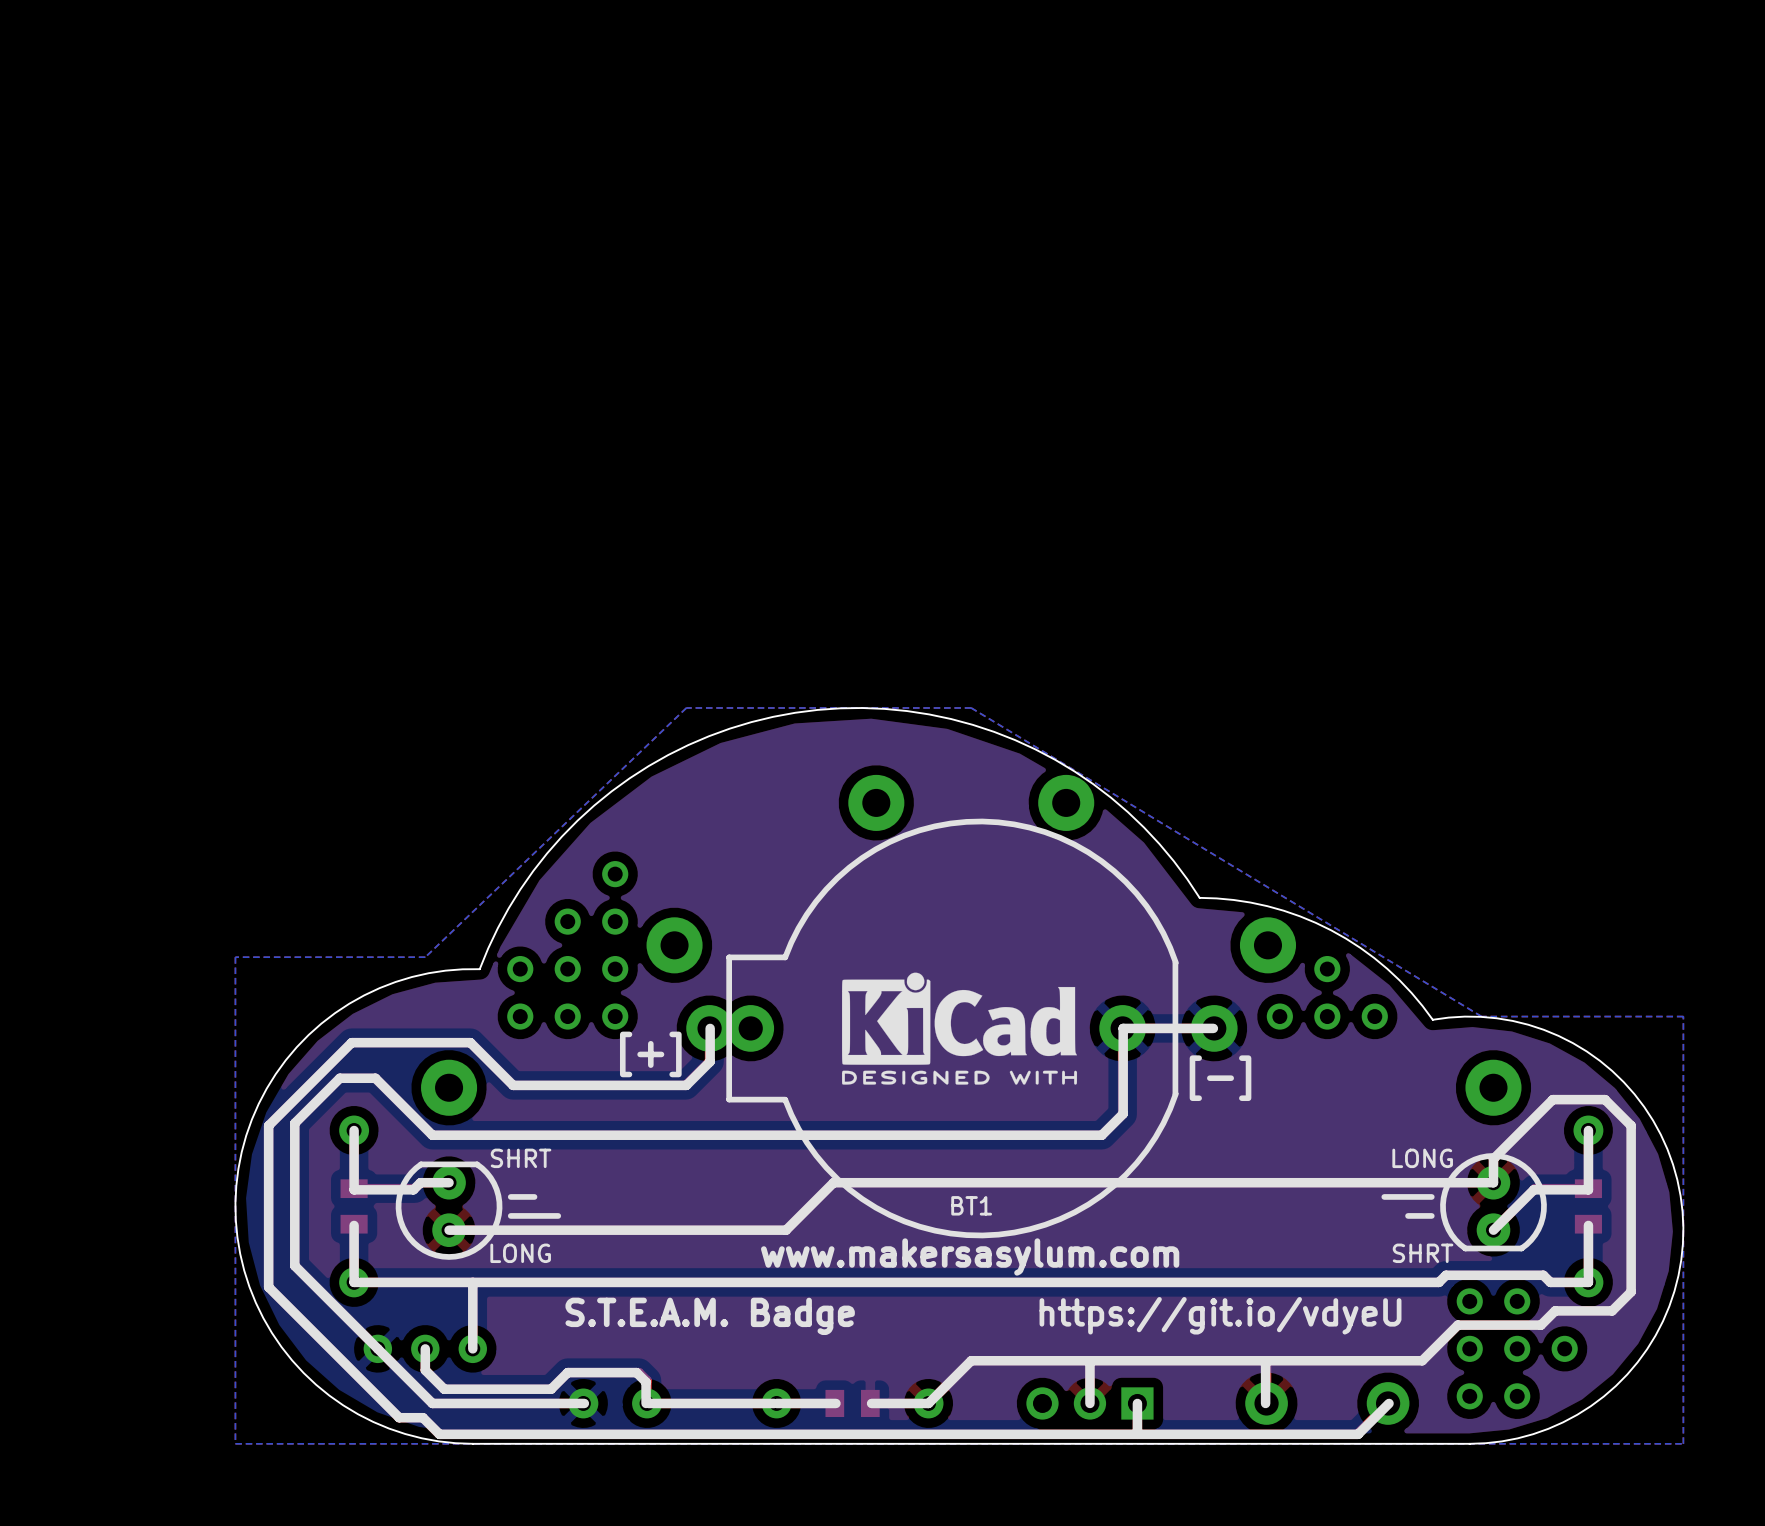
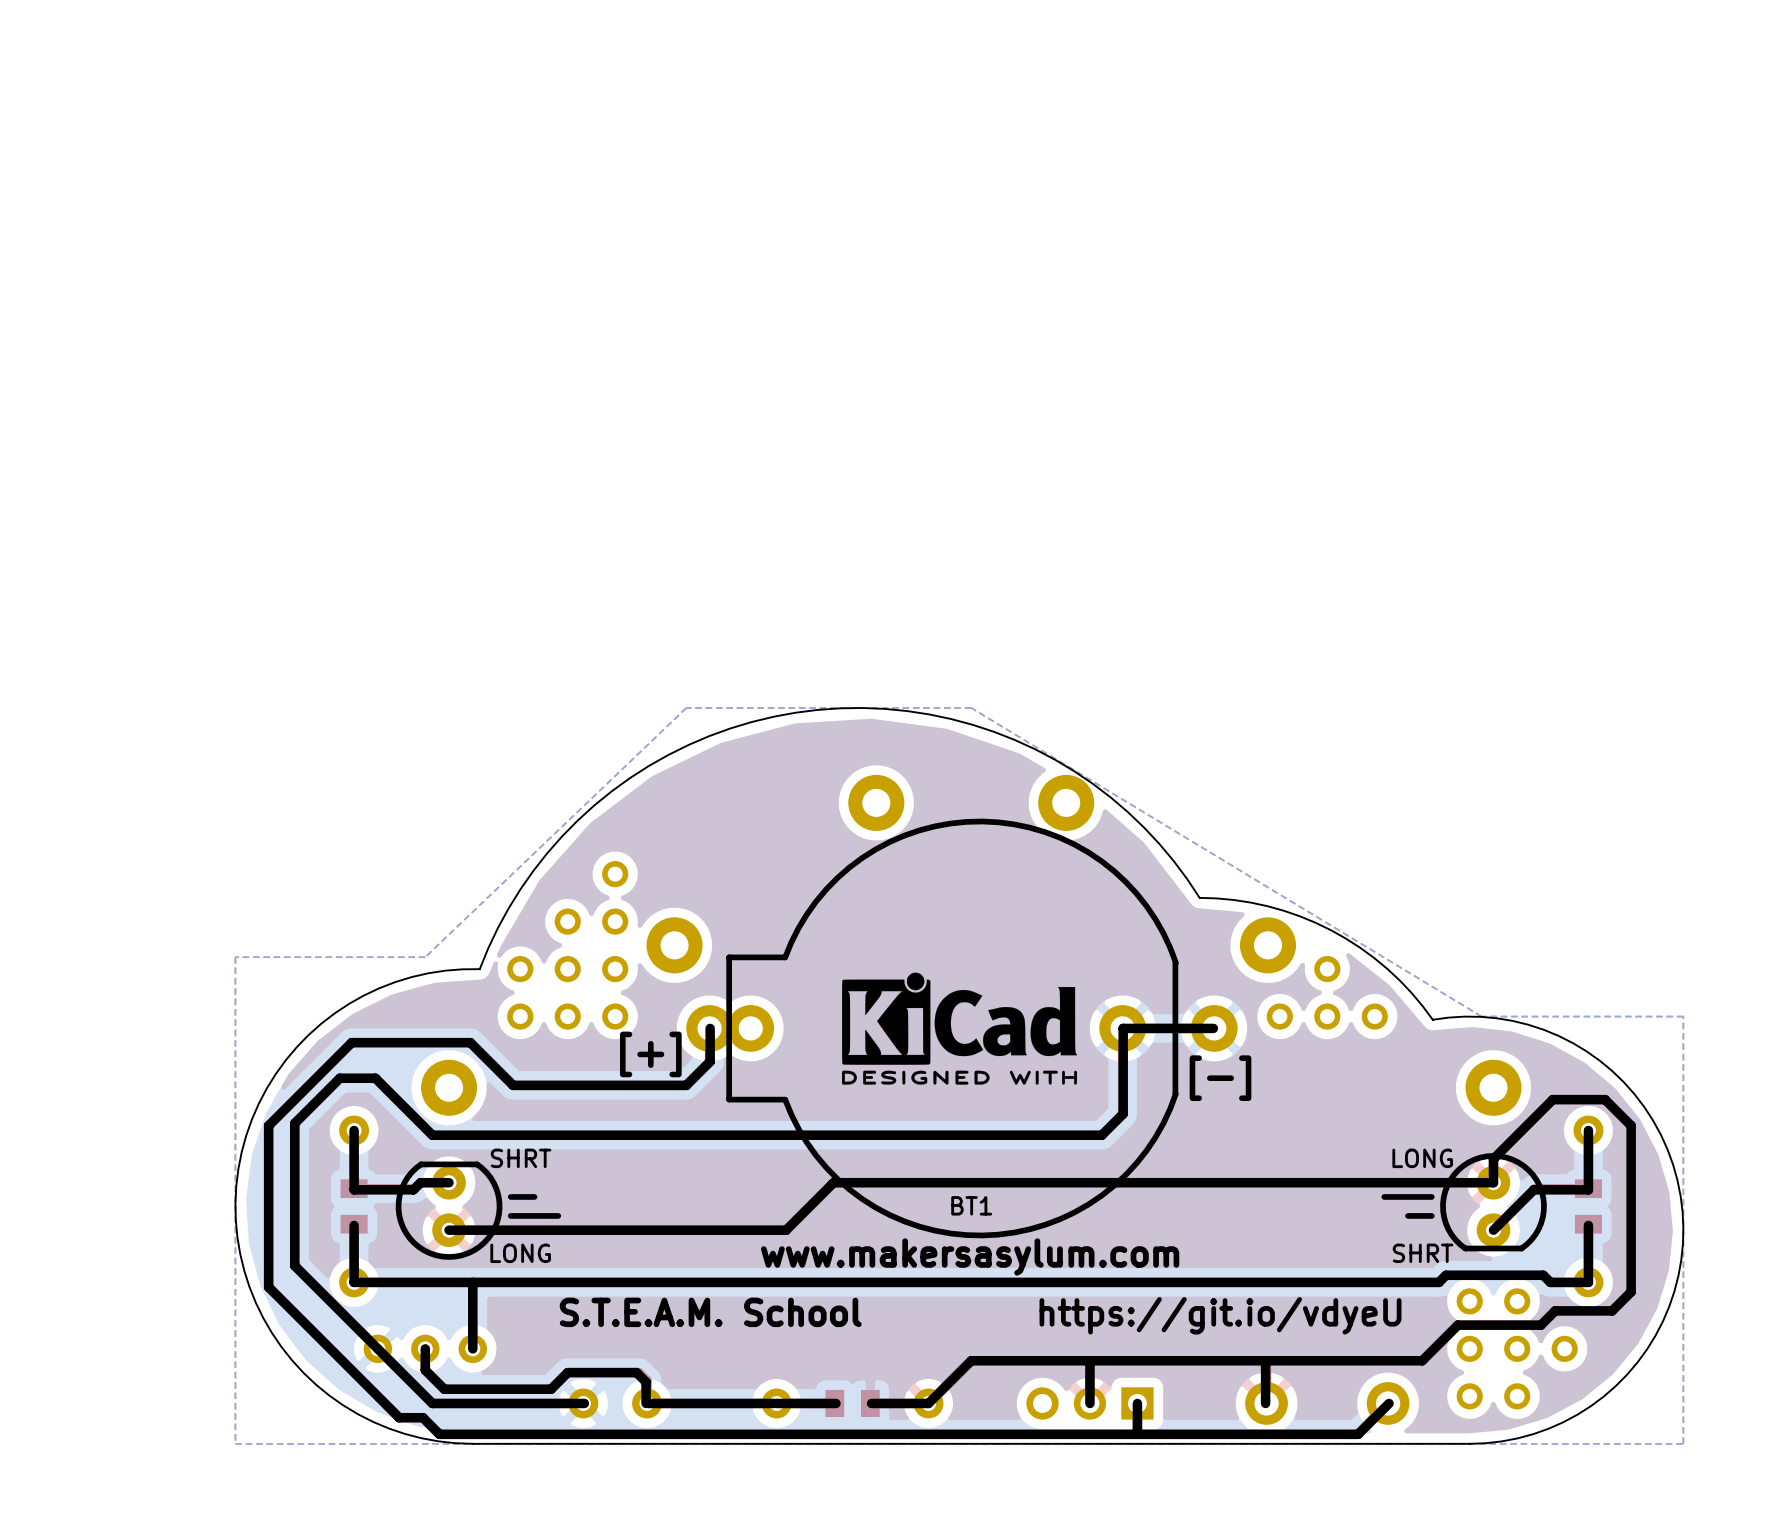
text: S.T.E.A.M. Badge (710, 1316) -> S.T.E.A.M. School (710, 1312)

